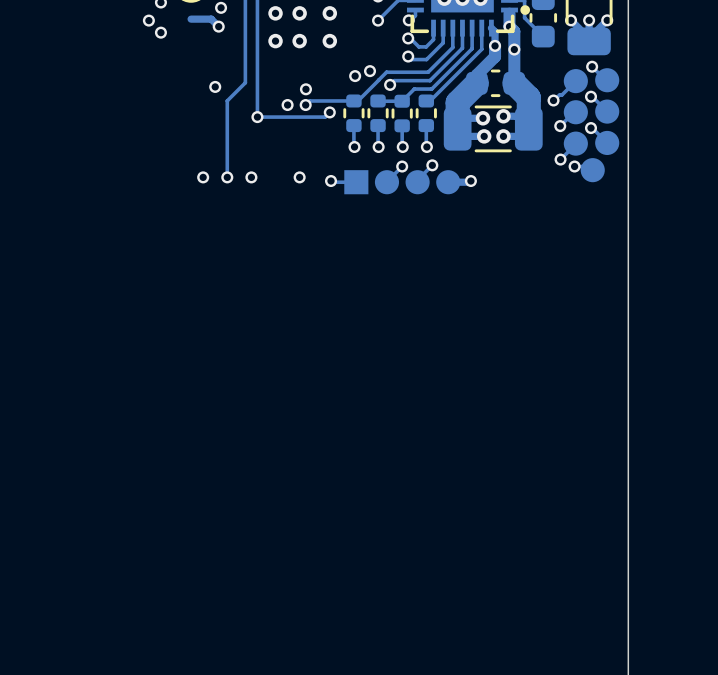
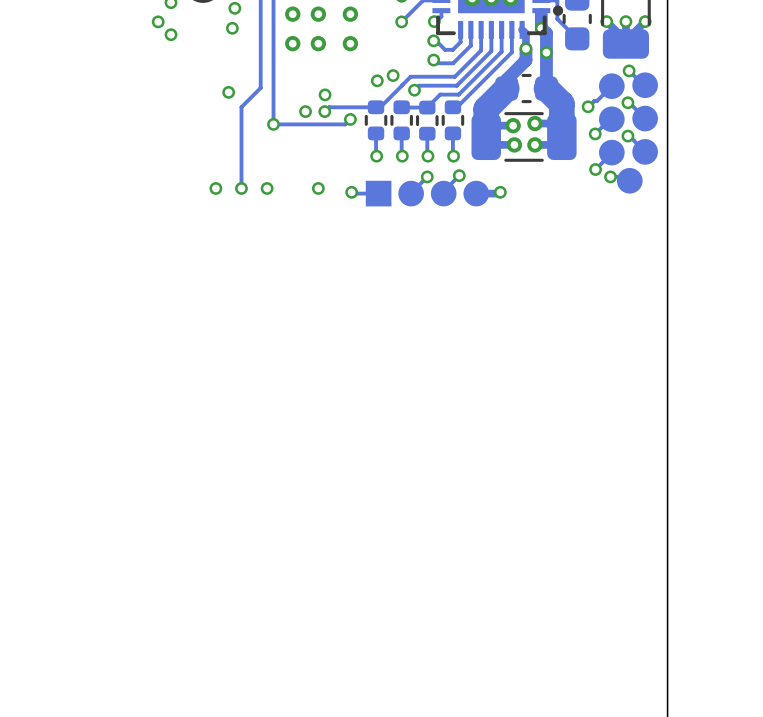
track: (191, 19) (211, 19) (218, 26) -> none

